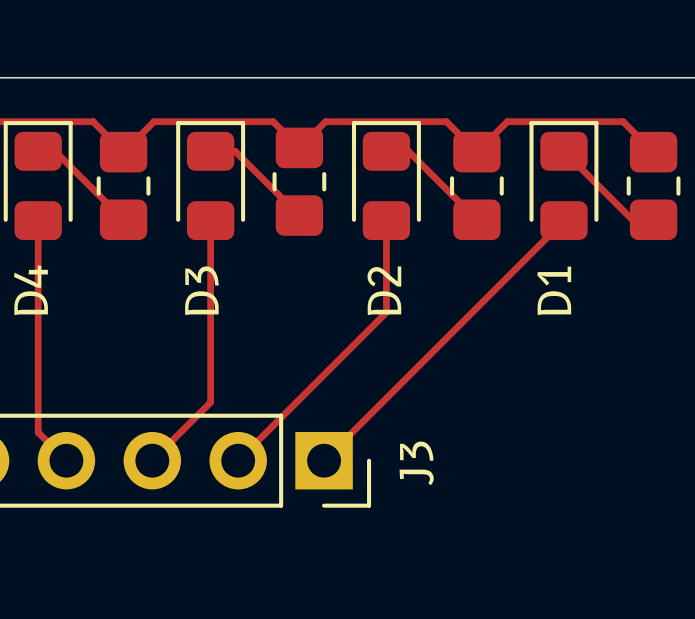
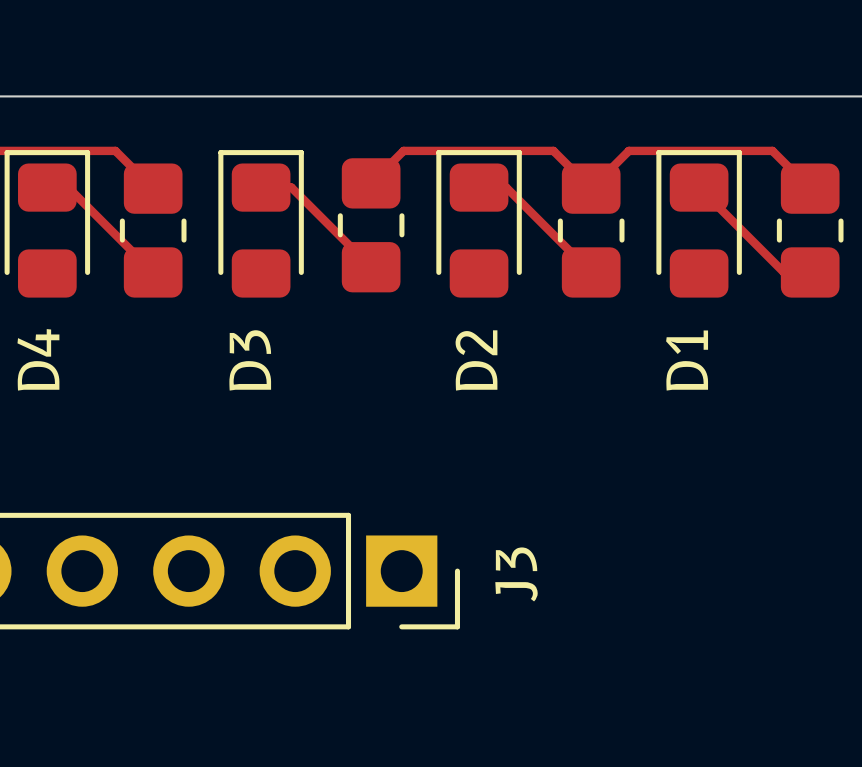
track: (299, 147) (273, 121) (154, 121) (123, 152) -> none
track: (38, 220) (38, 432) (66, 460) -> none
track: (210, 220) (210, 402) (152, 460) -> none
track: (386, 220) (386, 312) (238, 460) -> none
track: (563, 220) (324, 460) -> none

